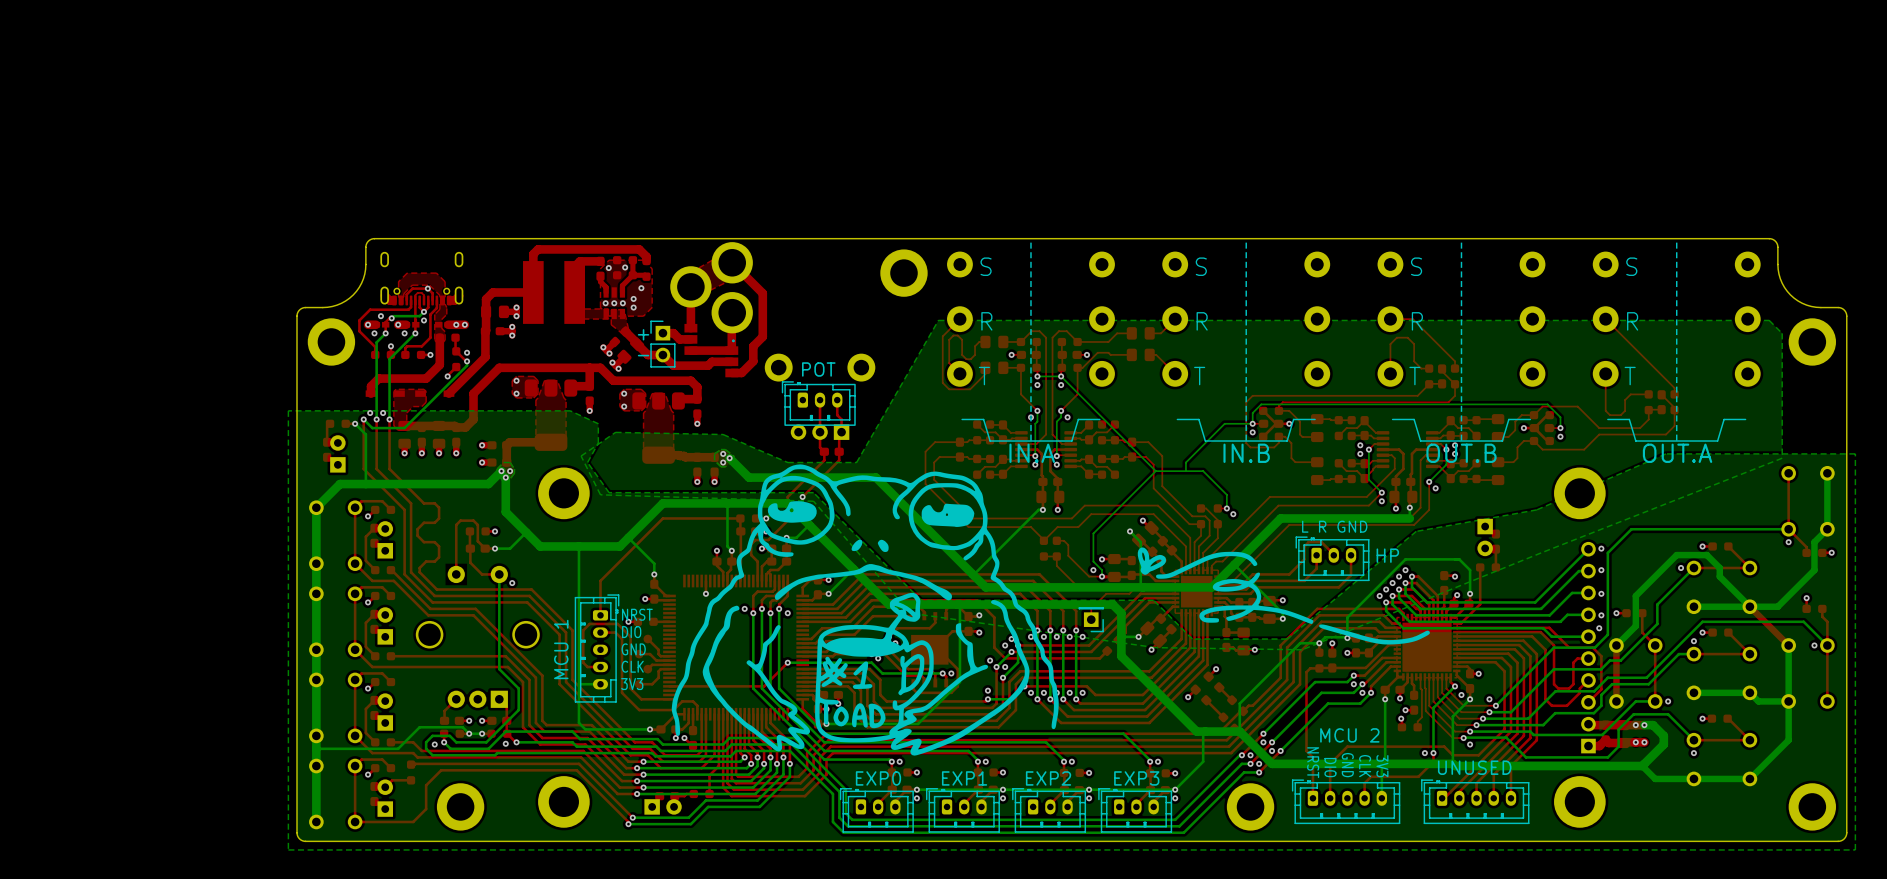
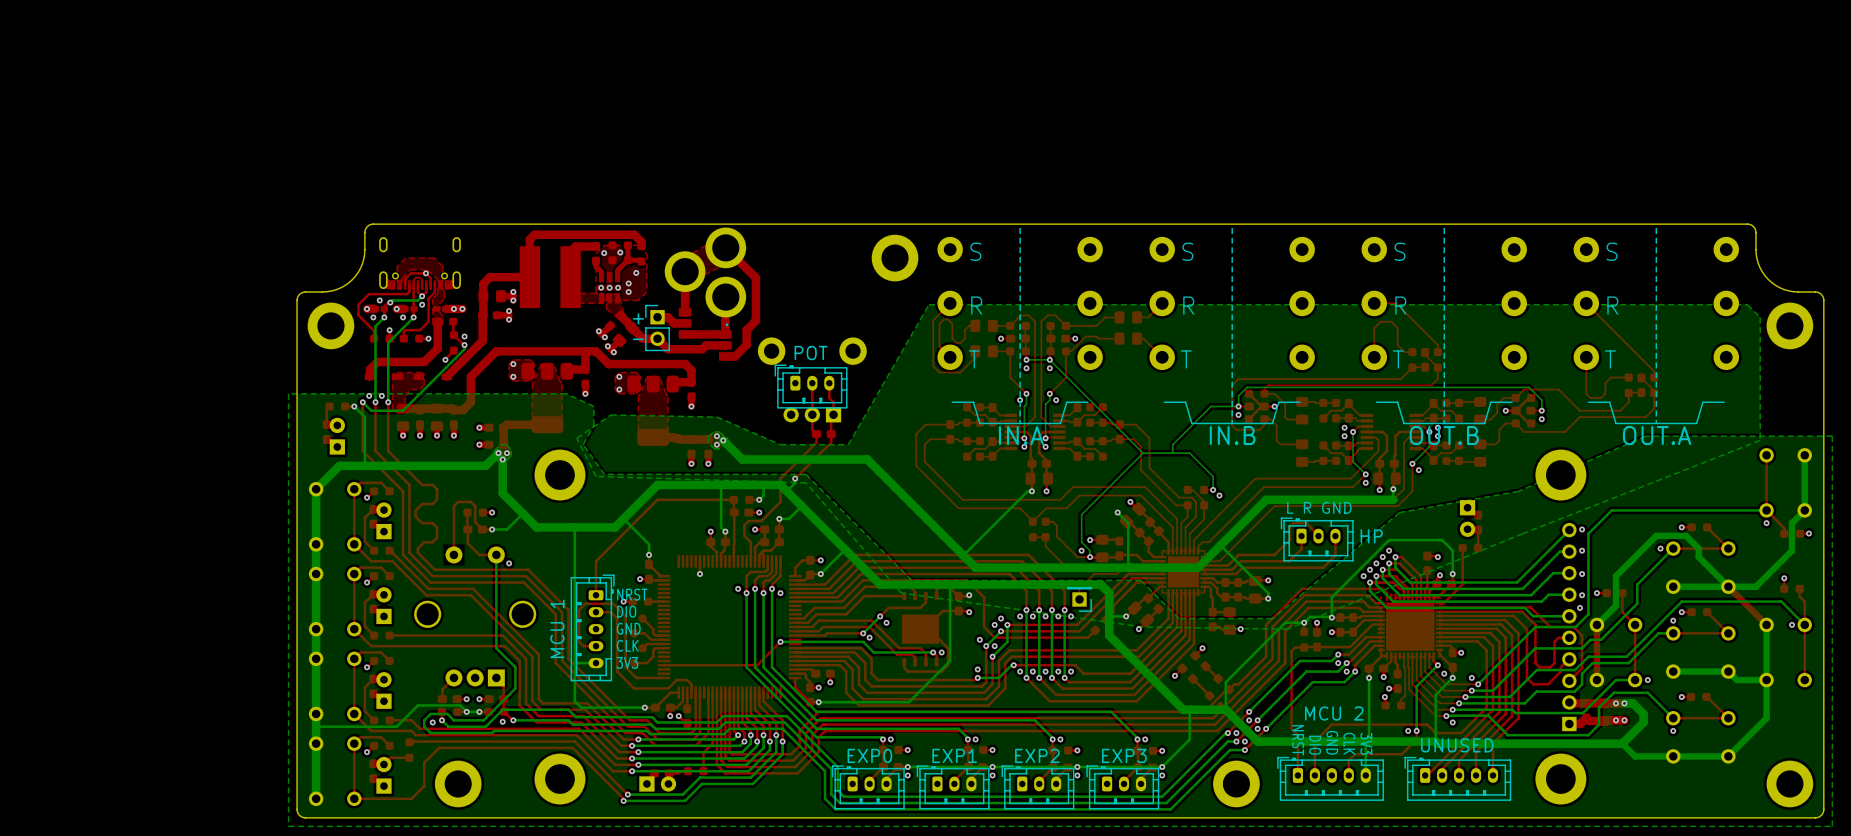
drawing: [671, 464, 1430, 756] -> none

